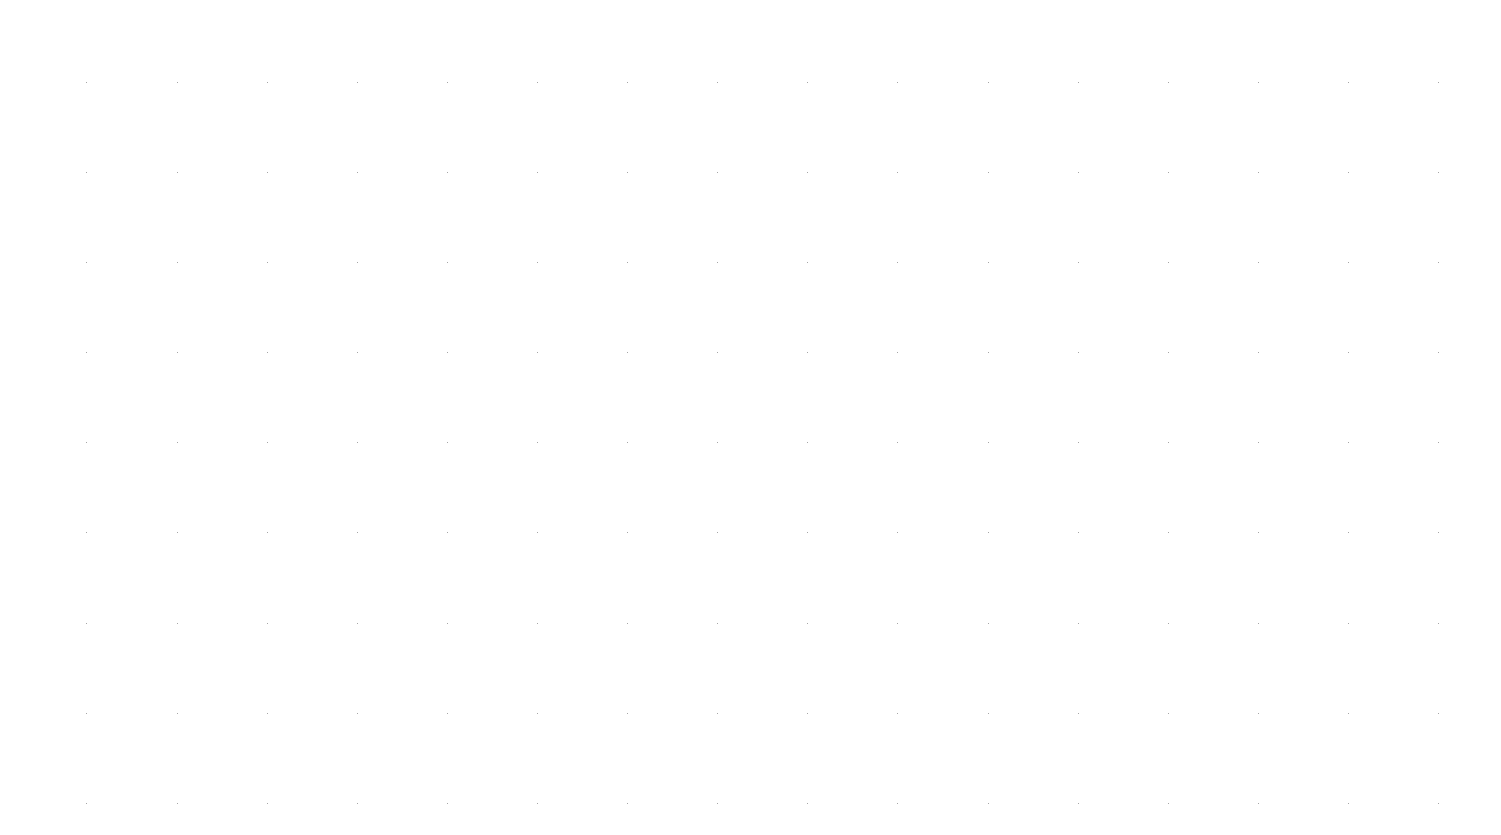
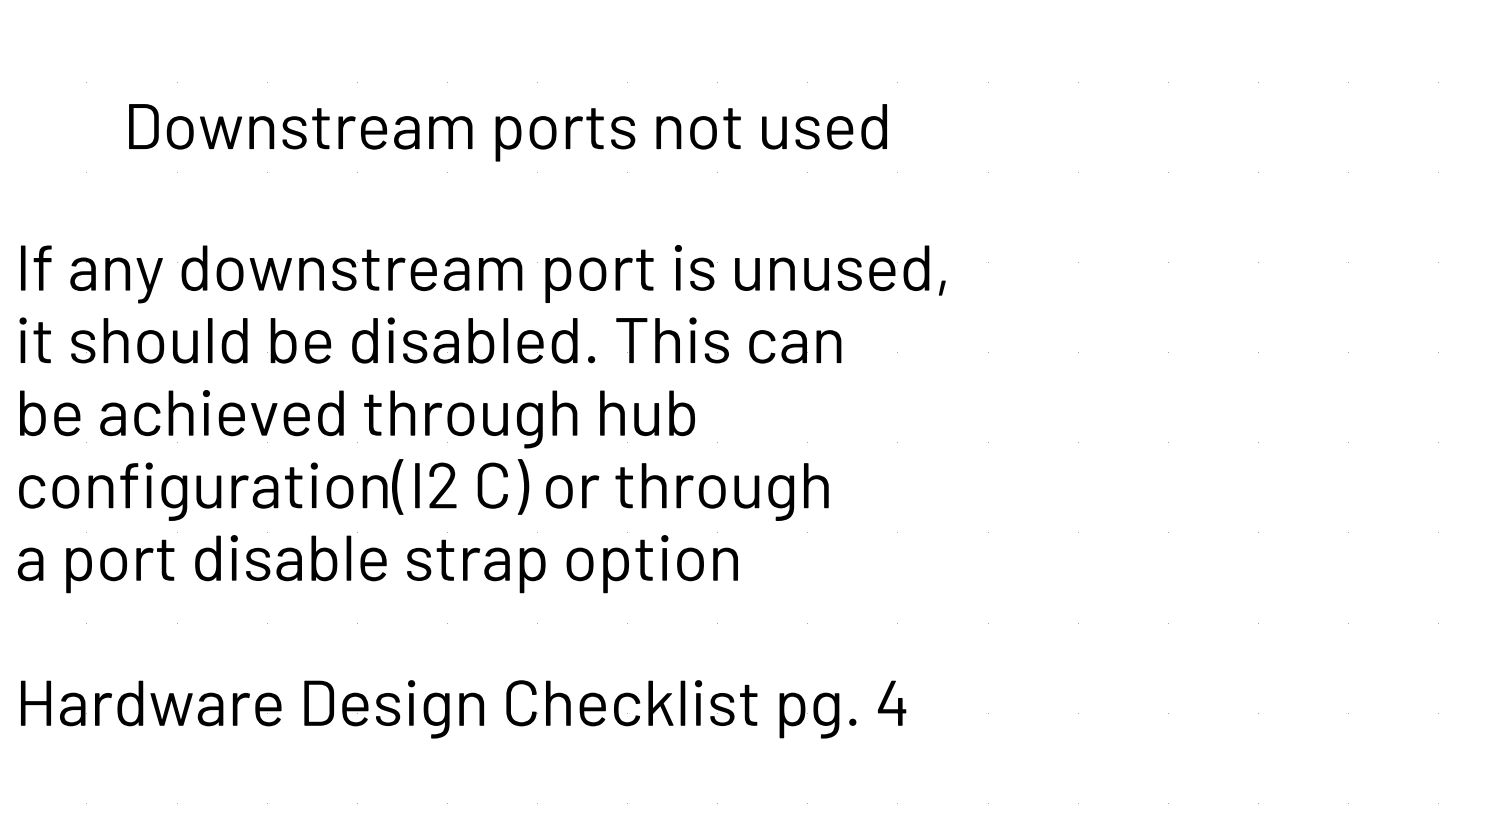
text: none -> Downstream ports not used (508, 132)
text: none -> If any downstream port is unused, (483, 274)
text: none -> it should be disabled. This can (430, 340)
text: none -> be achieved through hub (357, 419)
text: none -> configuration(I2 C) or through (423, 490)
text: none -> a port disable strap option (377, 564)
text: none -> Hardware Design Checklist pg. 4 (463, 709)

